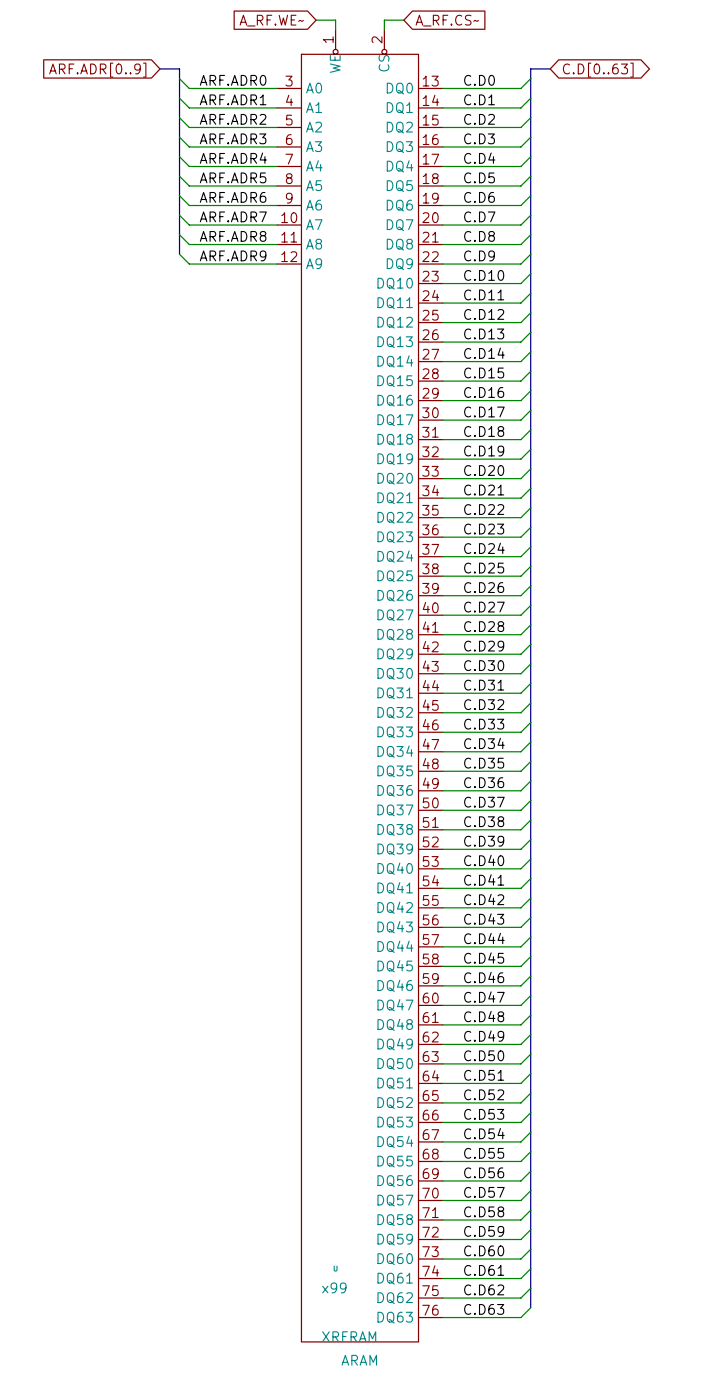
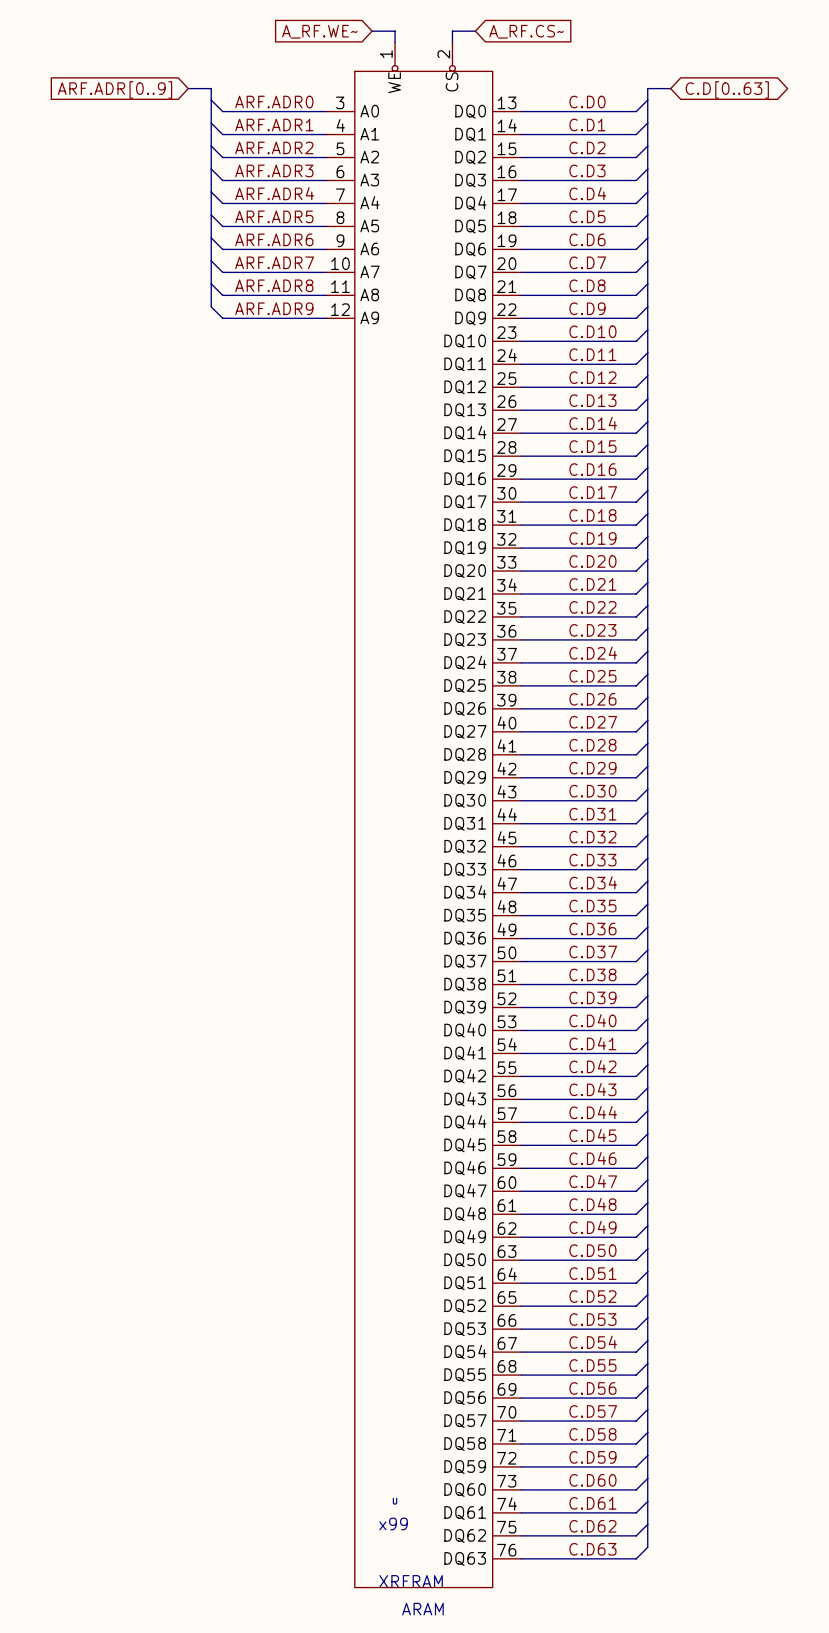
bus: (550, 68) (530, 68) (530, 1307) -> (670, 88) (647, 88) (647, 1547)
global label position: C.D[0..63] (598, 70) -> C.D[0..63] (727, 89)
wire: (530, 78) (520, 88) -> (647, 100) (636, 111) (613, 111)
label position: C.D0 (479, 80) -> C.D0 (587, 102)
wire: (530, 98) (520, 107) -> (647, 123) (636, 134) (613, 134)
label position: C.D1 (479, 99) -> C.D1 (587, 124)
wire: (530, 117) (520, 127) -> (647, 146) (636, 157) (613, 157)
label position: C.D2 (479, 119) -> C.D2 (587, 147)
wire: (530, 137) (520, 146) -> (647, 169) (636, 180) (613, 180)
label position: C.D3 (479, 138) -> C.D3 (587, 170)
wire: (530, 156) (520, 166) -> (647, 191) (636, 203) (613, 203)
label position: C.D4 (479, 158) -> C.D4 (587, 193)
wire: (530, 176) (520, 186) -> (647, 214) (636, 226) (613, 226)
label position: C.D5 (479, 177) -> C.D5 (587, 216)
wire: (530, 195) (520, 205) -> (647, 237) (636, 249) (613, 249)
label position: C.D6 (479, 197) -> C.D6 (587, 239)
wire: (530, 215) (520, 225) -> (647, 260) (636, 272) (613, 272)
label position: C.D7 (479, 216) -> C.D7 (587, 262)
wire: (530, 234) (520, 244) -> (647, 283) (636, 295) (613, 295)
label position: C.D8 (479, 236) -> C.D8 (587, 285)
wire: (530, 254) (520, 264) -> (647, 306) (636, 318) (613, 318)
label position: C.D9 (479, 255) -> C.D9 (587, 308)
wire: (530, 273) (520, 283) -> (647, 329) (636, 341) (613, 341)
label position: C.D10 (484, 275) -> C.D10 (592, 331)
wire: (530, 293) (520, 303) -> (647, 352) (636, 364) (613, 364)
label position: C.D11 (484, 294) -> C.D11 (592, 354)
wire: (530, 312) (520, 322) -> (647, 375) (636, 387) (613, 387)
label position: C.D12 (484, 314) -> C.D12 (592, 377)
wire: (530, 332) (520, 342) -> (647, 398) (636, 410) (613, 410)
label position: C.D13 (484, 333) -> C.D13 (592, 400)
wire: (530, 351) (520, 361) -> (647, 421) (636, 433) (613, 433)
label position: C.D14 (484, 353) -> C.D14 (593, 423)
wire: (530, 371) (520, 381) -> (647, 444) (636, 456) (613, 456)
label position: C.D15 (484, 372) -> C.D15 (592, 446)
wire: (530, 390) (520, 400) -> (647, 467) (636, 479) (613, 479)
label position: C.D16 (484, 392) -> C.D16 (592, 469)
wire: (530, 410) (520, 420) -> (647, 490) (636, 502) (613, 502)
label position: C.D17 (484, 411) -> C.D17 (593, 492)
wire: (530, 429) (520, 439) -> (647, 513) (636, 525) (613, 525)
label position: C.D18 (484, 431) -> C.D18 (592, 515)
wire: (530, 449) (520, 459) -> (647, 536) (636, 548) (613, 548)
label position: C.D19 (484, 451) -> C.D19 (592, 538)
wire: (530, 468) (520, 478) -> (647, 559) (636, 571) (613, 571)
label position: C.D20 (484, 470) -> C.D20 (592, 561)
wire: (530, 488) (520, 498) -> (647, 582) (636, 594) (613, 594)
label position: C.D21 (484, 490) -> C.D21 (592, 584)
wire: (530, 507) (520, 517) -> (647, 605) (636, 616) (613, 616)
label position: C.D22 (484, 509) -> C.D22 (592, 607)
wire: (530, 527) (520, 537) -> (647, 628) (636, 639) (613, 639)
label position: C.D23 (484, 529) -> C.D23 (592, 630)
wire: (530, 546) (520, 556) -> (647, 651) (636, 662) (613, 662)
label position: C.D24 (484, 548) -> C.D24 (593, 653)
wire: (530, 566) (520, 576) -> (647, 674) (636, 685) (613, 685)
label position: C.D25 (484, 568) -> C.D25 (592, 676)
wire: (530, 585) (520, 595) -> (647, 697) (636, 708) (613, 708)
label position: C.D26 (484, 587) -> C.D26 (592, 699)
wire: (530, 605) (520, 615) -> (647, 720) (636, 731) (613, 731)
label position: C.D27 (484, 607) -> C.D27 (593, 722)
wire: (530, 624) (520, 634) -> (647, 743) (636, 754) (613, 754)
label position: C.D28 (484, 626) -> C.D28 (592, 745)
wire: (530, 644) (520, 654) -> (647, 766) (636, 777) (613, 777)
label position: C.D29 (484, 646) -> C.D29 (592, 768)
wire: (530, 663) (520, 673) -> (647, 789) (636, 800) (613, 800)
label position: C.D30 (484, 665) -> C.D30 (592, 791)
wire: (530, 683) (520, 693) -> (647, 812) (636, 823) (613, 823)
label position: C.D31 (484, 685) -> C.D31 (592, 814)
wire: (530, 703) (520, 712) -> (647, 835) (636, 846) (613, 846)
label position: C.D32 (484, 704) -> C.D32 (592, 837)
wire: (530, 722) (520, 732) -> (647, 858) (636, 869) (613, 869)
label position: C.D33 (484, 724) -> C.D33 (592, 860)
wire: (530, 742) (520, 751) -> (647, 881) (636, 892) (613, 892)
label position: C.D34 (484, 743) -> C.D34 (593, 882)
wire: (530, 761) (520, 771) -> (647, 904) (636, 915) (613, 915)
label position: C.D35 (484, 763) -> C.D35 (592, 906)
wire: (530, 781) (520, 790) -> (647, 927) (636, 938) (613, 938)
label position: C.D36 (484, 782) -> C.D36 (592, 929)
wire: (530, 800) (520, 810) -> (647, 950) (636, 961) (613, 961)
label position: C.D37 (484, 802) -> C.D37 (593, 952)
wire: (530, 820) (520, 829) -> (647, 973) (636, 984) (613, 984)
label position: C.D38 (484, 821) -> C.D38 (592, 974)
wire: (530, 839) (520, 849) -> (647, 996) (636, 1007) (613, 1007)
label position: C.D39 (484, 841) -> C.D39 (592, 997)
wire: (530, 859) (520, 868) -> (647, 1018) (636, 1030) (613, 1030)
label position: C.D40 (484, 860) -> C.D40 (592, 1020)
wire: (530, 878) (520, 888) -> (647, 1041) (636, 1053) (613, 1053)
label position: C.D41 (484, 879) -> C.D41 (592, 1043)
wire: (530, 898) (520, 907) -> (647, 1064) (636, 1076) (613, 1076)
label position: C.D42 (484, 899) -> C.D42 (592, 1066)
wire: (530, 917) (520, 927) -> (647, 1087) (636, 1099) (613, 1099)
label position: C.D43 (484, 919) -> C.D43 (592, 1089)
wire: (530, 937) (520, 946) -> (647, 1110) (636, 1122) (613, 1122)
label position: C.D44 (484, 938) -> C.D44 (593, 1112)
wire: (530, 956) (520, 966) -> (647, 1133) (636, 1145) (613, 1145)
label position: C.D45 (484, 958) -> C.D45 (592, 1135)
wire: (530, 976) (520, 985) -> (647, 1156) (636, 1168) (613, 1168)
label position: C.D46 (484, 977) -> C.D46 (592, 1158)
wire: (530, 995) (520, 1005) -> (647, 1179) (636, 1191) (613, 1191)
label position: C.D47 (484, 997) -> C.D47 (593, 1181)
wire: (530, 1015) (520, 1024) -> (647, 1202) (636, 1214) (613, 1214)
label position: C.D48 (484, 1016) -> C.D48 (592, 1204)
wire: (530, 1034) (520, 1044) -> (647, 1225) (636, 1237) (613, 1237)
label position: C.D49 (484, 1036) -> C.D49 (592, 1227)
wire: (530, 1054) (520, 1063) -> (647, 1248) (636, 1260) (613, 1260)
label position: C.D50 (484, 1055) -> C.D50 (592, 1250)
wire: (530, 1073) (520, 1083) -> (647, 1271) (636, 1283) (613, 1283)
label position: C.D51 (484, 1075) -> C.D51 (592, 1273)
wire: (530, 1093) (520, 1102) -> (647, 1294) (636, 1306) (613, 1306)
label position: C.D52 (484, 1094) -> C.D52 (592, 1296)
wire: (530, 1112) (520, 1122) -> (647, 1317) (636, 1329) (613, 1329)
label position: C.D53 (484, 1114) -> C.D53 (592, 1319)
wire: (530, 1132) (520, 1141) -> (647, 1340) (636, 1352) (613, 1352)
label position: C.D54 (484, 1133) -> C.D54 (593, 1342)
wire: (530, 1151) (520, 1161) -> (647, 1363) (636, 1375) (613, 1375)
label position: C.D55 (484, 1153) -> C.D55 (592, 1365)
wire: (530, 1171) (520, 1180) -> (647, 1386) (636, 1398) (613, 1398)
label position: C.D56 (484, 1172) -> C.D56 (592, 1388)
wire: (530, 1190) (520, 1200) -> (647, 1409) (636, 1421) (613, 1421)
label position: C.D57 (484, 1192) -> C.D57 (593, 1411)
wire: (530, 1210) (520, 1220) -> (647, 1432) (636, 1443) (613, 1443)
label position: C.D58 (484, 1211) -> C.D58 (592, 1434)
wire: (530, 1229) (520, 1239) -> (647, 1455) (636, 1466) (613, 1466)
label position: C.D59 (484, 1231) -> C.D59 (592, 1457)
wire: (530, 1249) (520, 1259) -> (647, 1478) (636, 1489) (613, 1489)
label position: C.D60 (484, 1250) -> C.D60 (592, 1480)
wire: (530, 1268) (520, 1278) -> (647, 1501) (636, 1512) (613, 1512)
label position: C.D61 (484, 1270) -> C.D61 (592, 1503)
wire: (530, 1288) (520, 1298) -> (647, 1524) (636, 1535) (613, 1535)
label position: C.D62 (484, 1289) -> C.D62 (592, 1526)
wire: (530, 1307) (520, 1317) -> (647, 1547) (636, 1558) (613, 1558)
label position: C.D63 (484, 1309) -> C.D63 (592, 1549)

